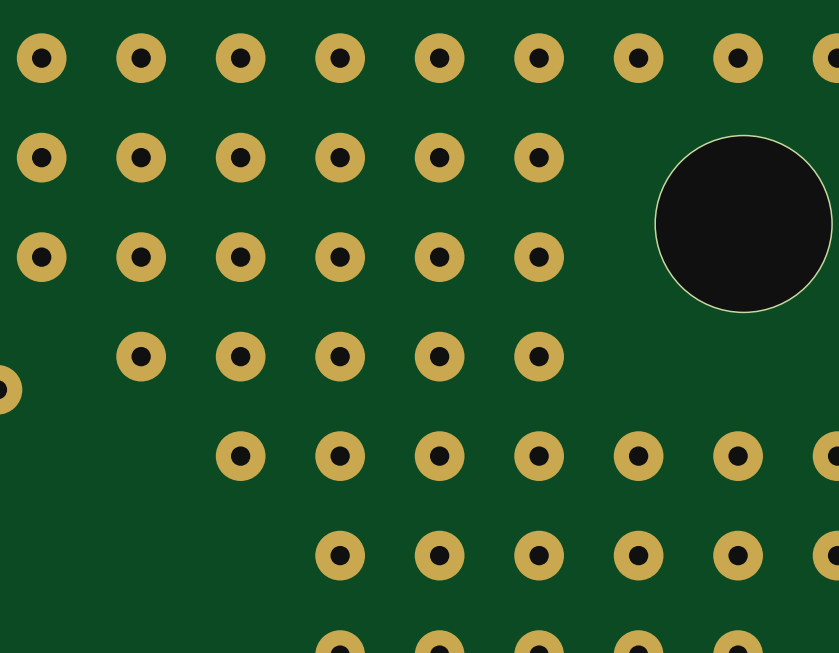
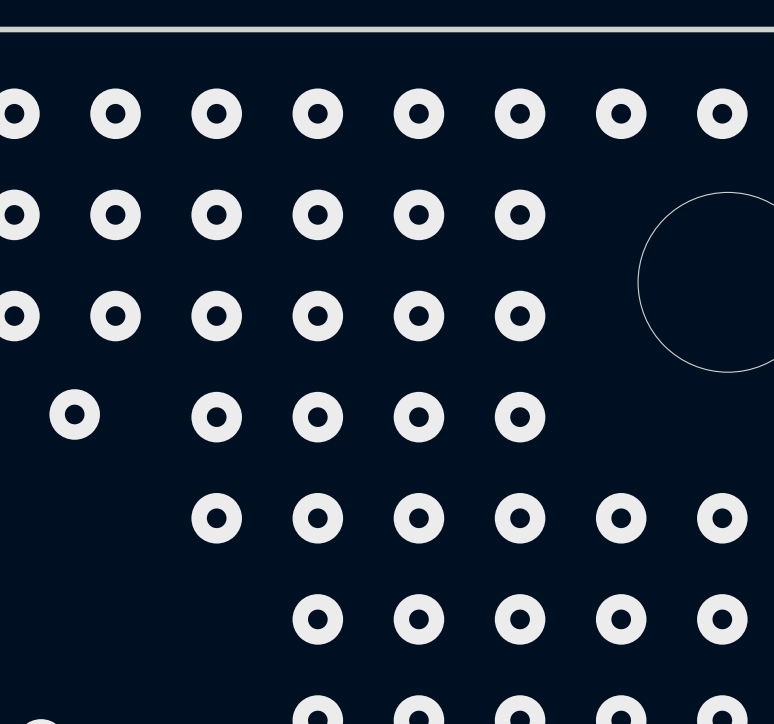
via position: (141, 356) -> (74, 414)

